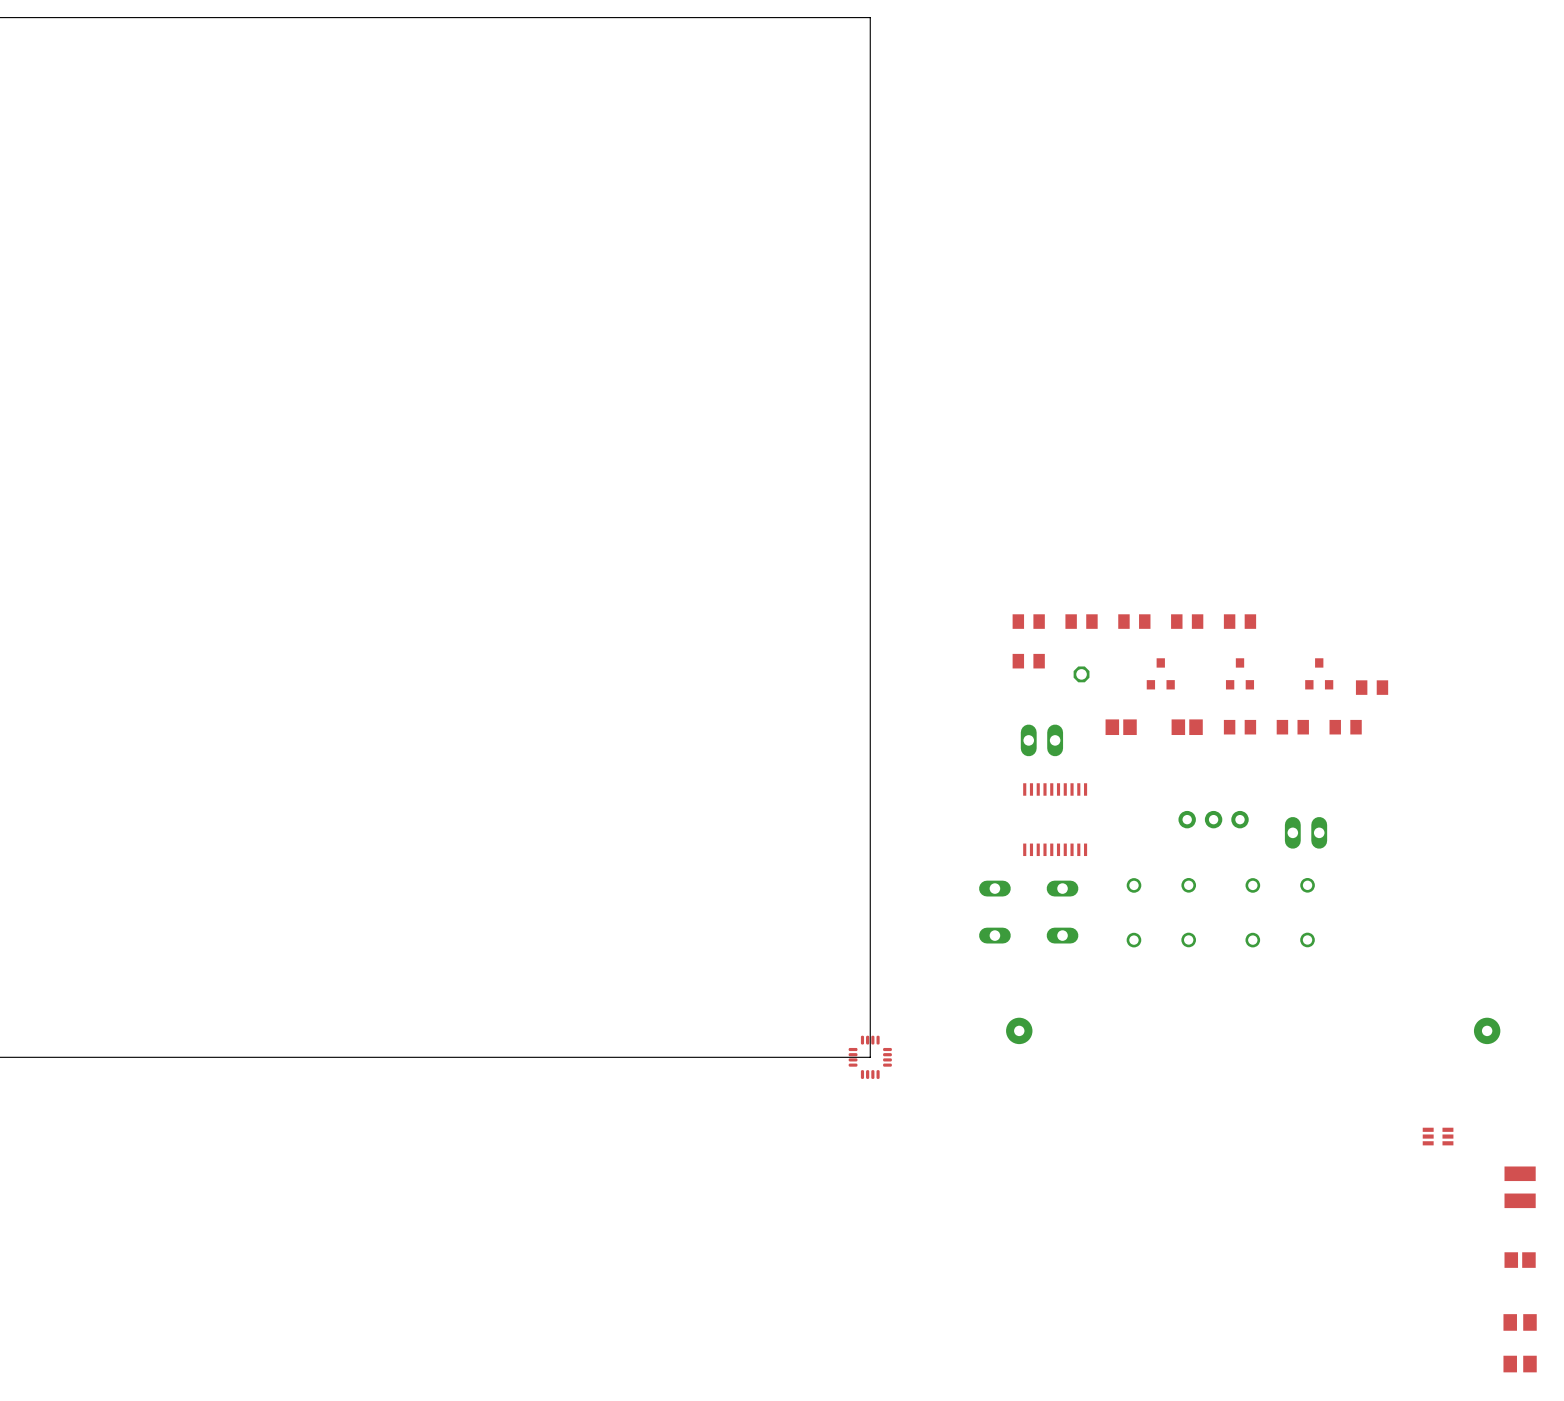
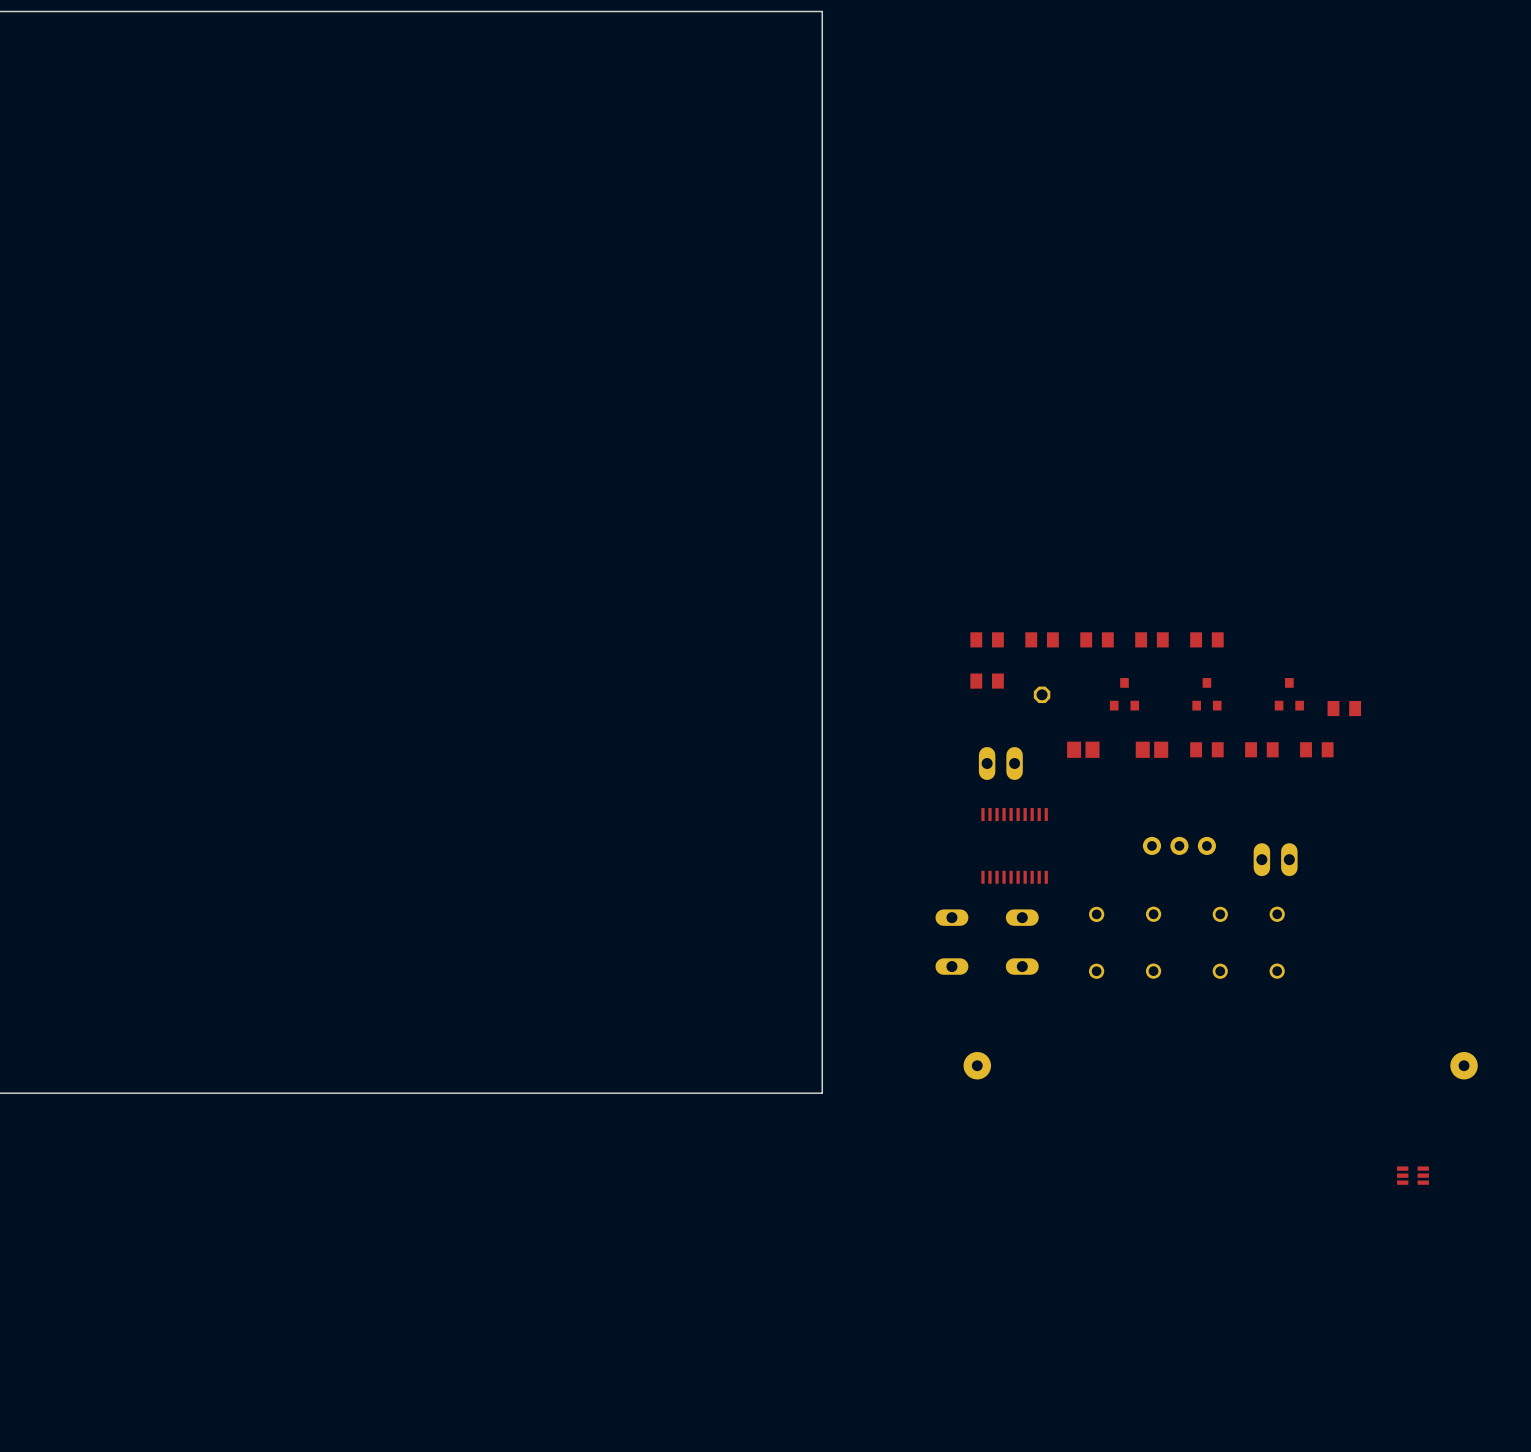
part: (870, 1057) -> none
part: (1520, 1187) -> none
part: (1520, 1260) -> none
part: (1520, 1322) -> none
part: (1520, 1364) -> none

